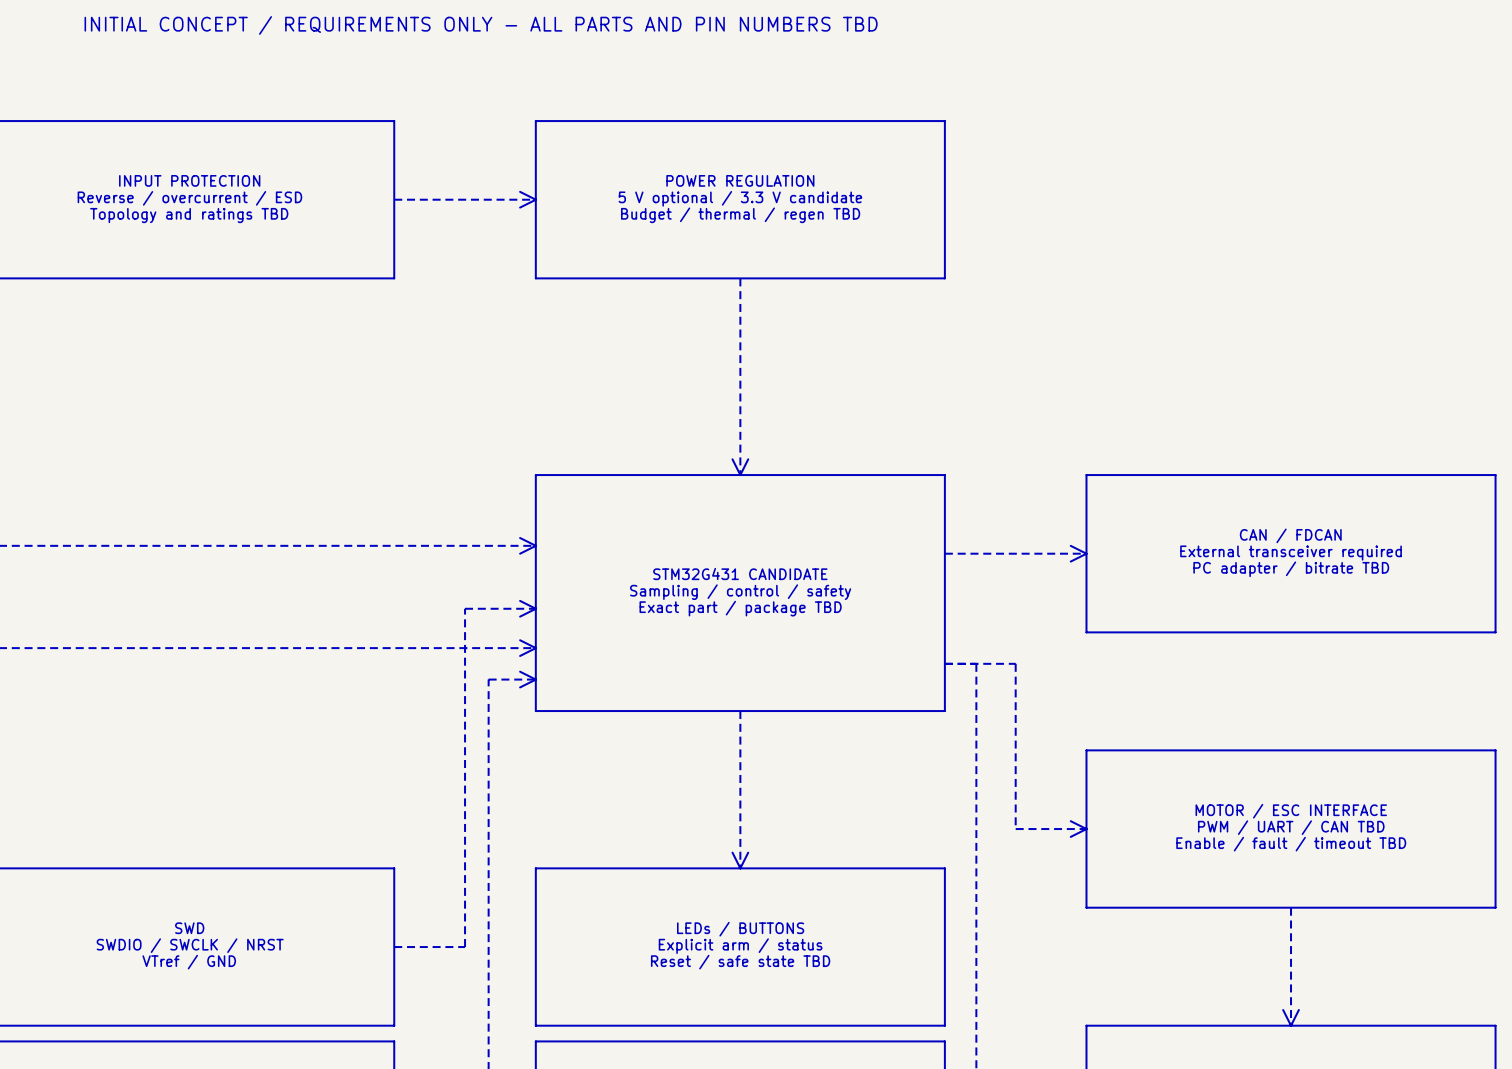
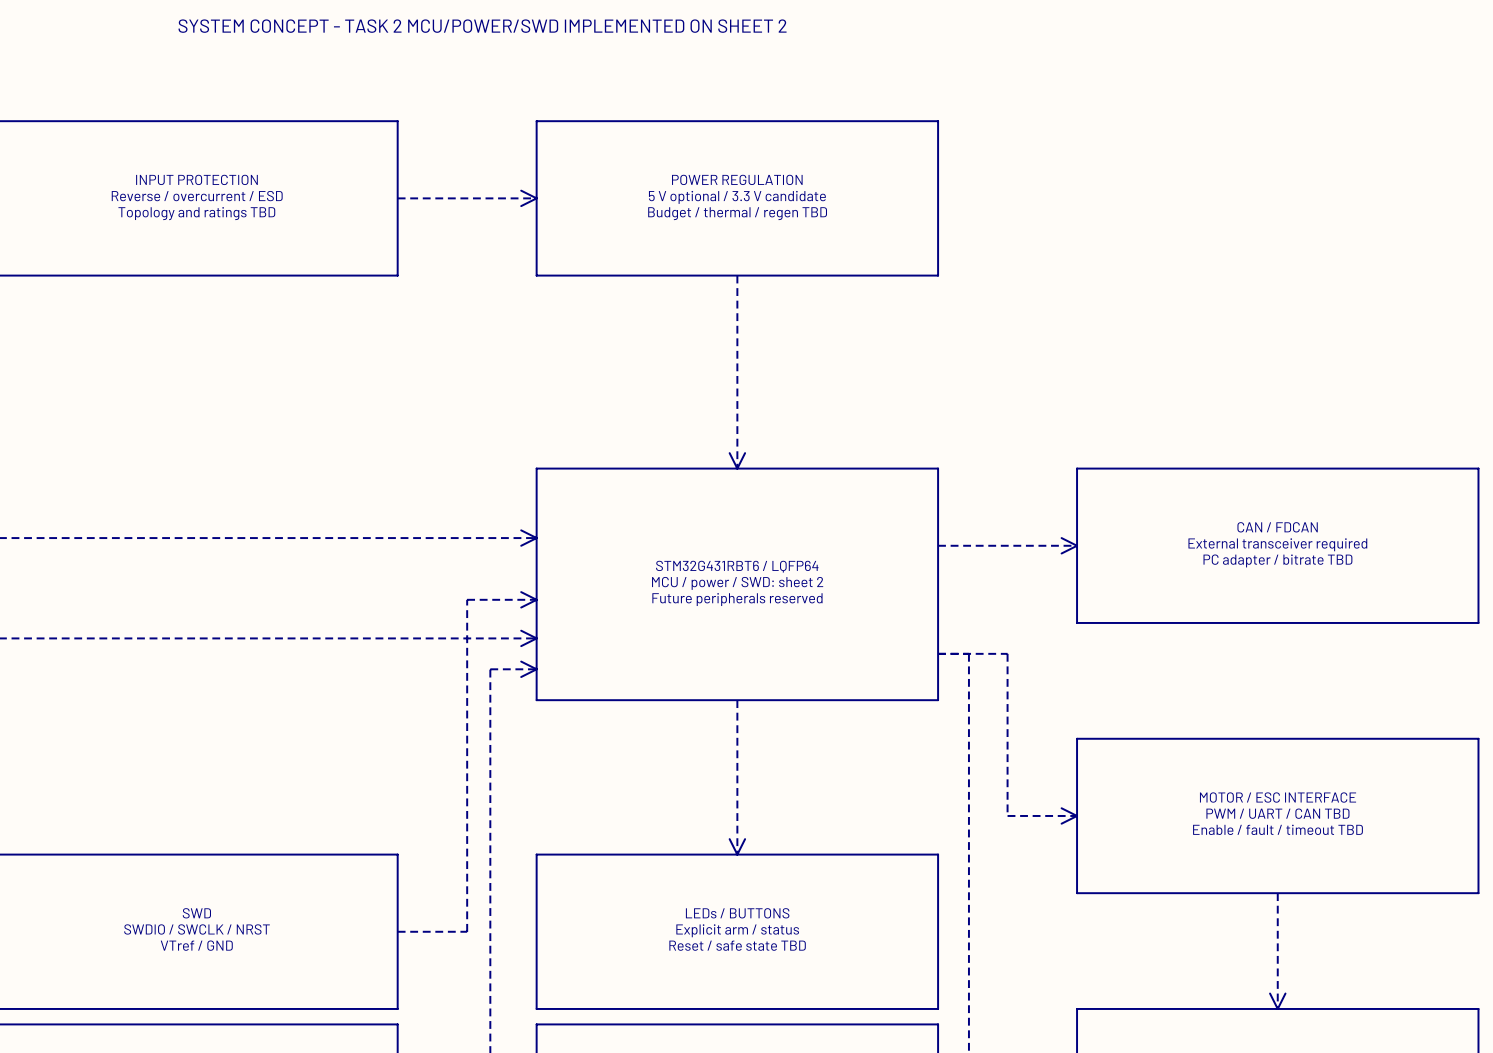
text: INITIAL CONCEPT / REQUIREMENTS ONLY - ALL PARTS AND PIN NUMBERS TBD (481, 25) -> SYSTEM CONCEPT - TASK 2 MCU/POWER/SWD IMPLEMENTED ON SHEET 2 (482, 26)
text: STM32G431 CANDIDATE (740, 573) -> STM32G431RBT6 / LQFP64 (737, 566)
text: Sampling / control / safety (740, 592) -> MCU / power / SWD: sheet 2 (737, 583)
text: Exact part / package TBD (740, 608) -> Future peripherals reserved (737, 599)

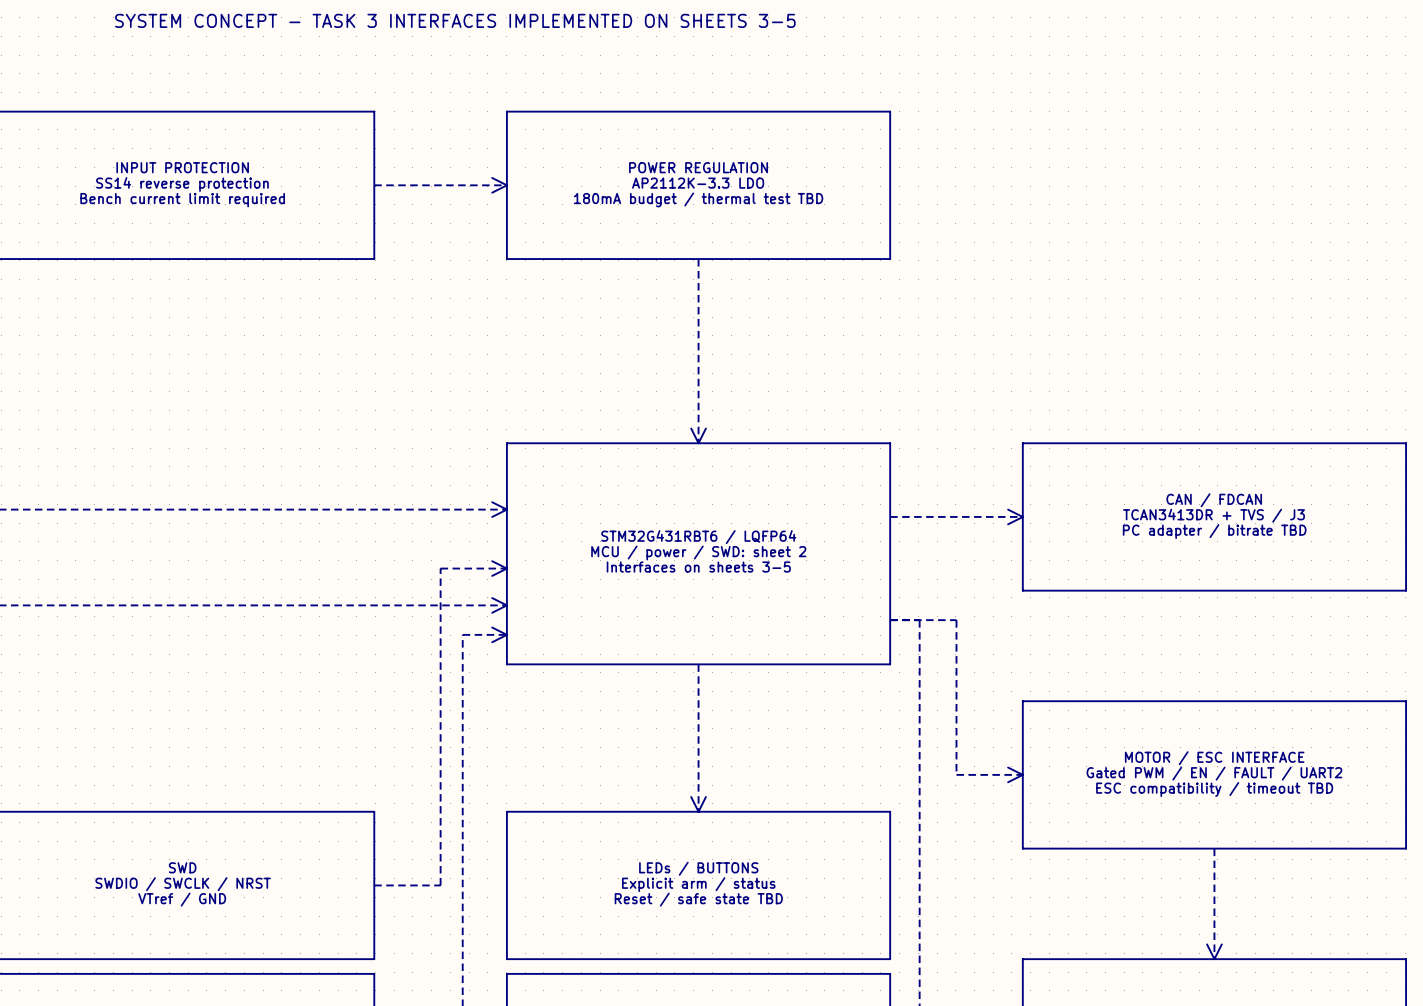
text: SYSTEM CONCEPT - TASK 2 MCU/POWER/SWD IMPLEMENTED ON SHEET 2 (482, 26) -> SYSTEM CONCEPT - TASK 3 INTERFACES IMPLEMENTED ON SHEETS 3-5 (455, 20)
text: Reverse / overcurrent / ESD (197, 196) -> SS14 reverse protection (182, 184)
text: 5 V optional / 3.3 V candidate (737, 197) -> AP2112K-3.3 LDO (698, 183)
text: Topology and ratings TBD (196, 213) -> Bench current limit required (182, 200)
text: Budget / thermal / regen TBD (737, 213) -> 180mA budget / thermal test TBD (698, 199)
text: External transceiver required (1277, 544) -> TCAN3413DR + TVS / J3 (1213, 515)
text: Future peripherals reserved (737, 599) -> Interfaces on sheets 3-5 (698, 567)
text: PWM / UART / CAN TBD (1277, 813) -> Gated PWM / EN / FAULT / UART2 (1214, 773)
text: Enable / fault / timeout TBD (1277, 829) -> ESC compatibility / timeout TBD (1214, 789)

